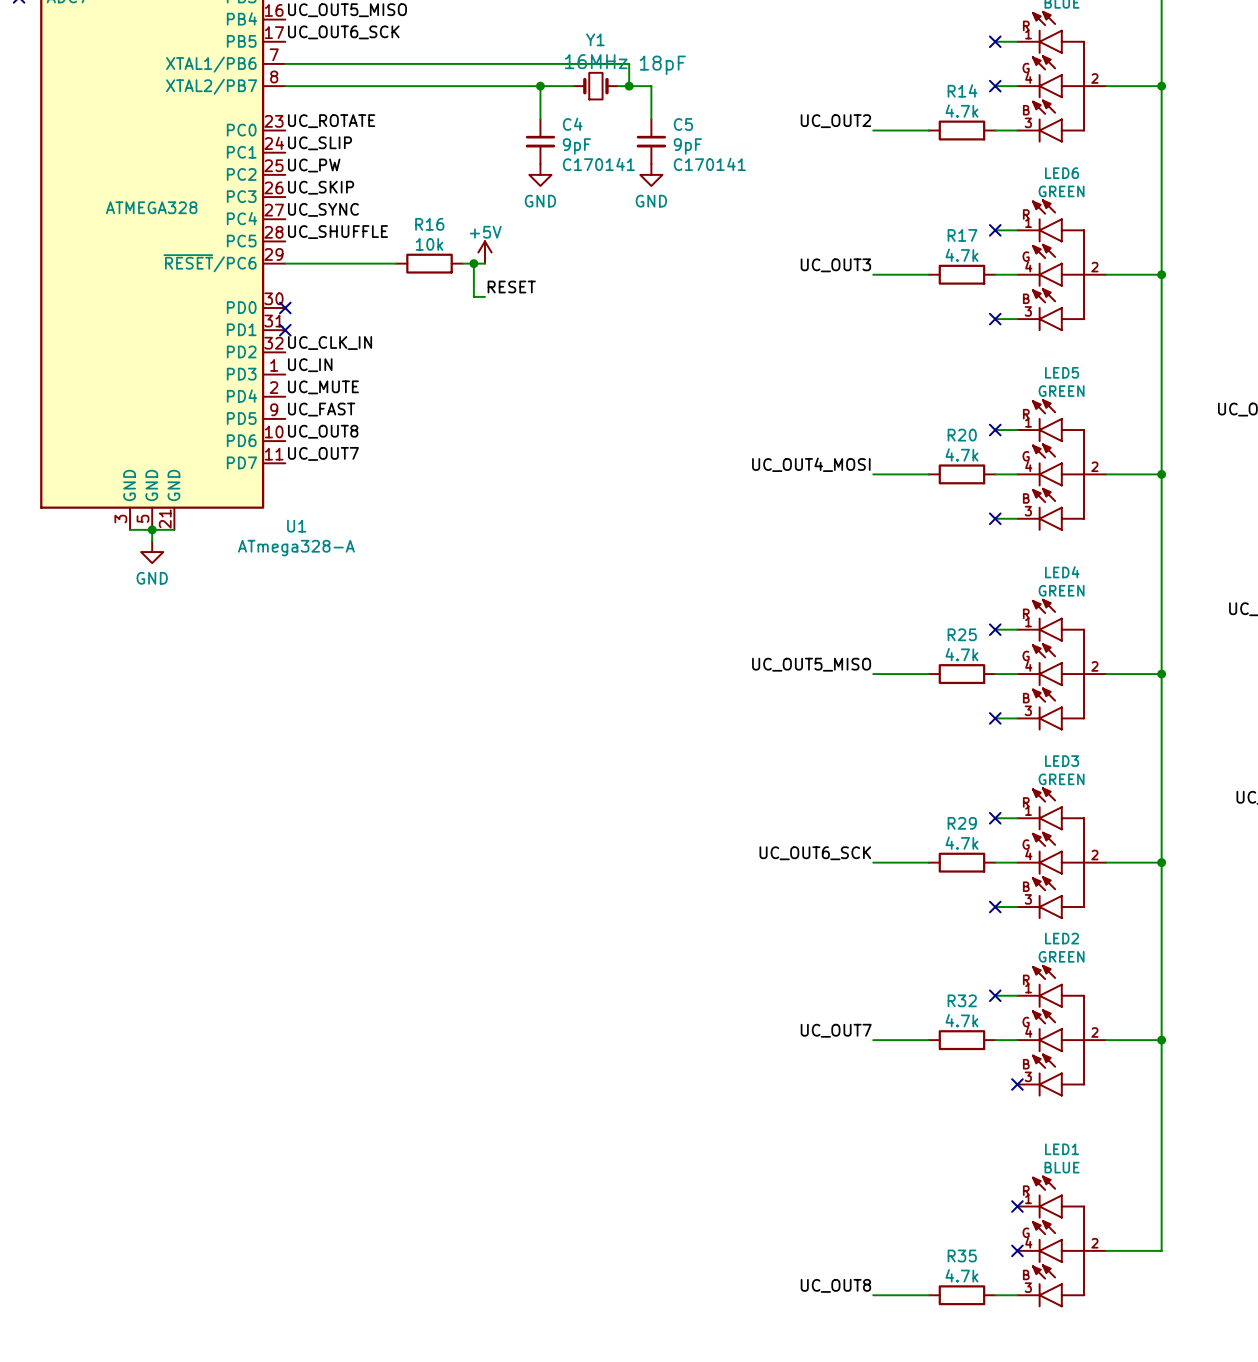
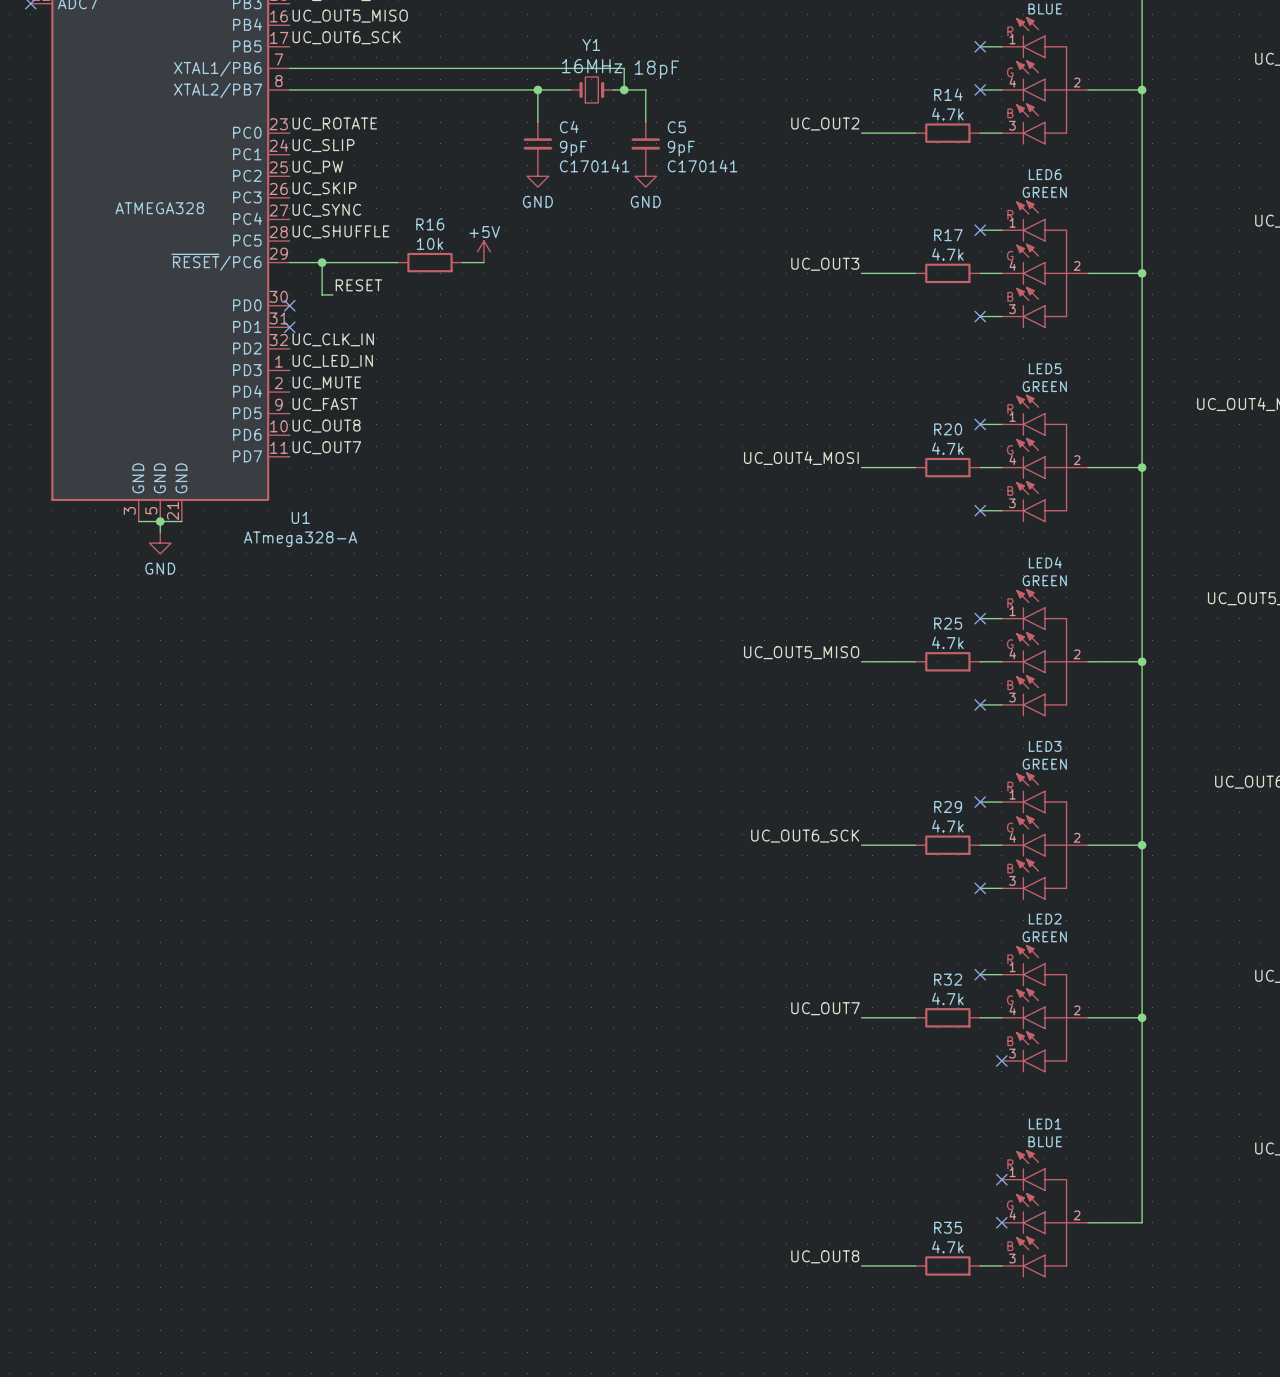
junction: none -> (322, 262)
wire: (473, 263) (473, 296) (484, 296) -> (322, 262) (322, 294) (332, 294)
junction: (473, 263) -> none
label position: RESET (511, 287) -> RESET (358, 285)
label: UC_IN (310, 365) -> UC_LED_IN (332, 361)

